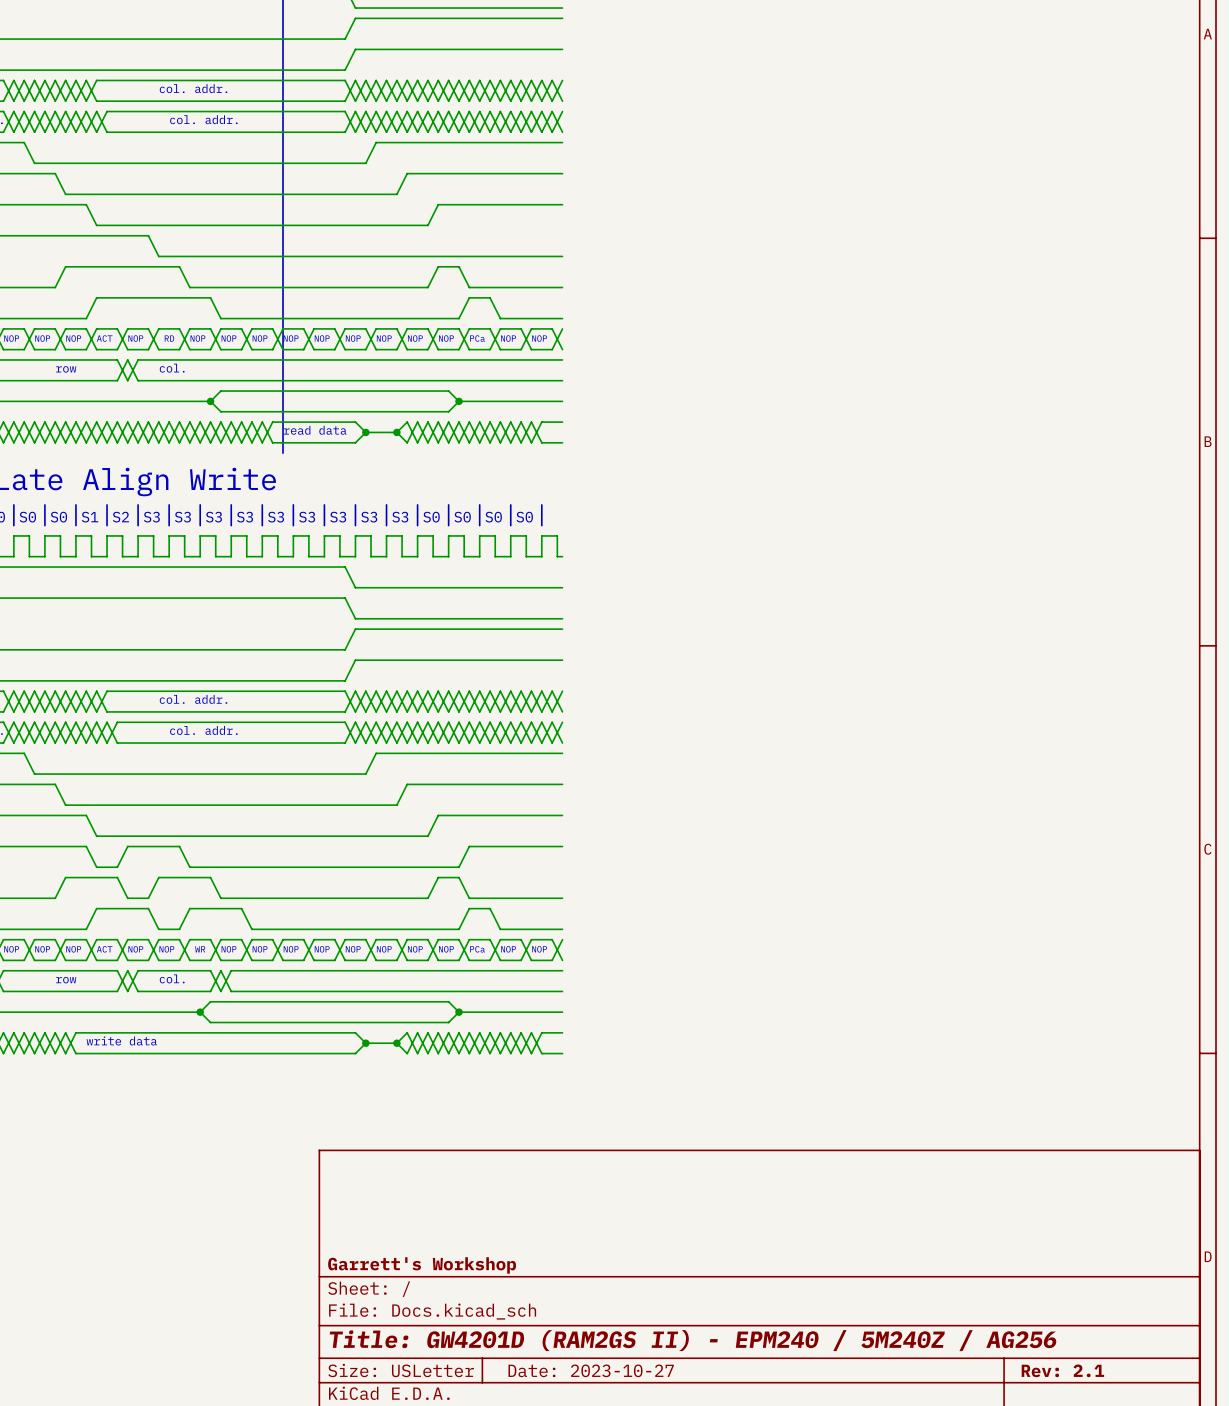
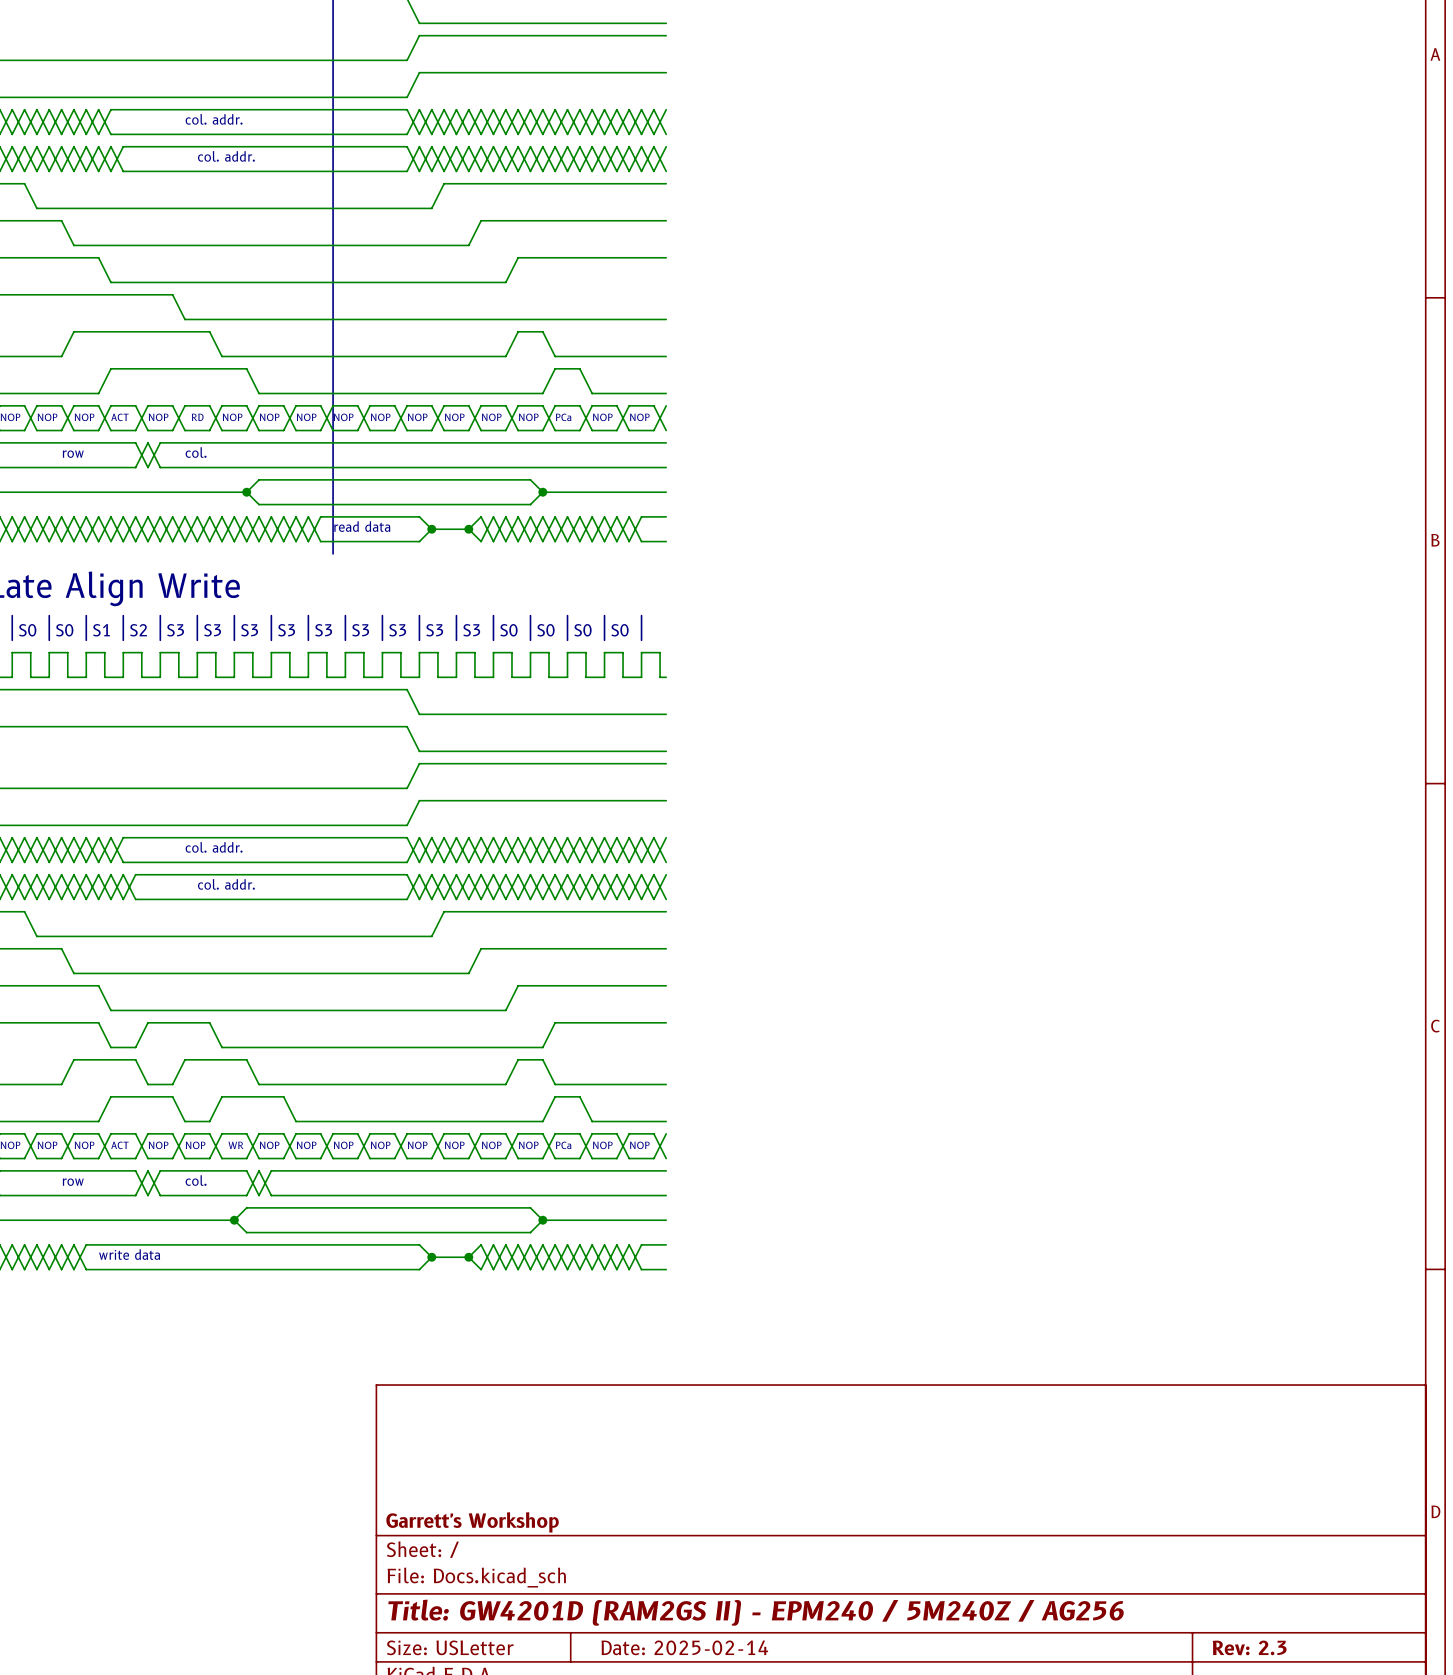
title block: Date: 2023-10-27 (591, 1370) -> Date: 2025-02-14 (684, 1647)
title block: Rev: 2.1 (1062, 1370) -> Rev: 2.3 (1249, 1647)

